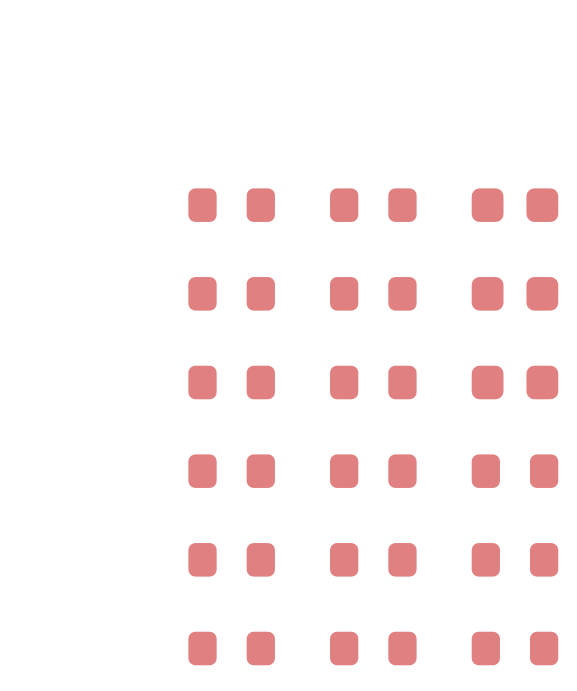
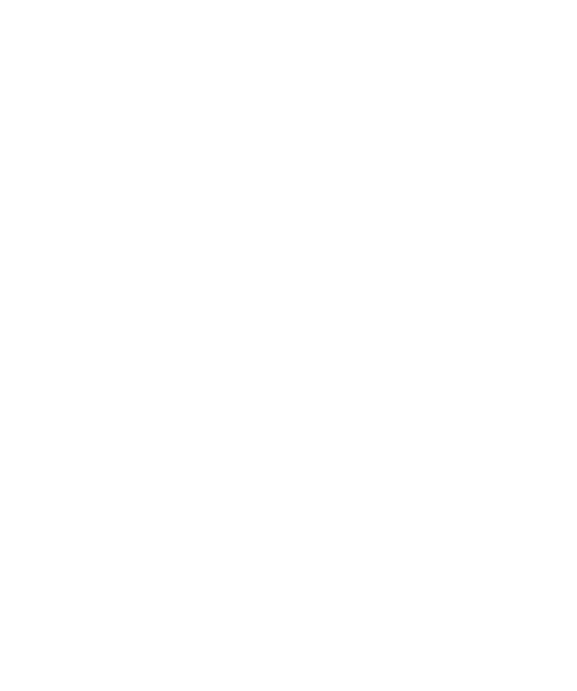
part: (231, 205) -> none
part: (373, 205) -> none
part: (514, 205) -> none
part: (231, 293) -> none
part: (373, 293) -> none
part: (514, 293) -> none
part: (231, 382) -> none
part: (373, 382) -> none
part: (514, 382) -> none
part: (231, 471) -> none
part: (373, 471) -> none
part: (514, 471) -> none
part: (231, 559) -> none
part: (373, 559) -> none
part: (514, 559) -> none
part: (231, 648) -> none
part: (373, 648) -> none
part: (514, 648) -> none

